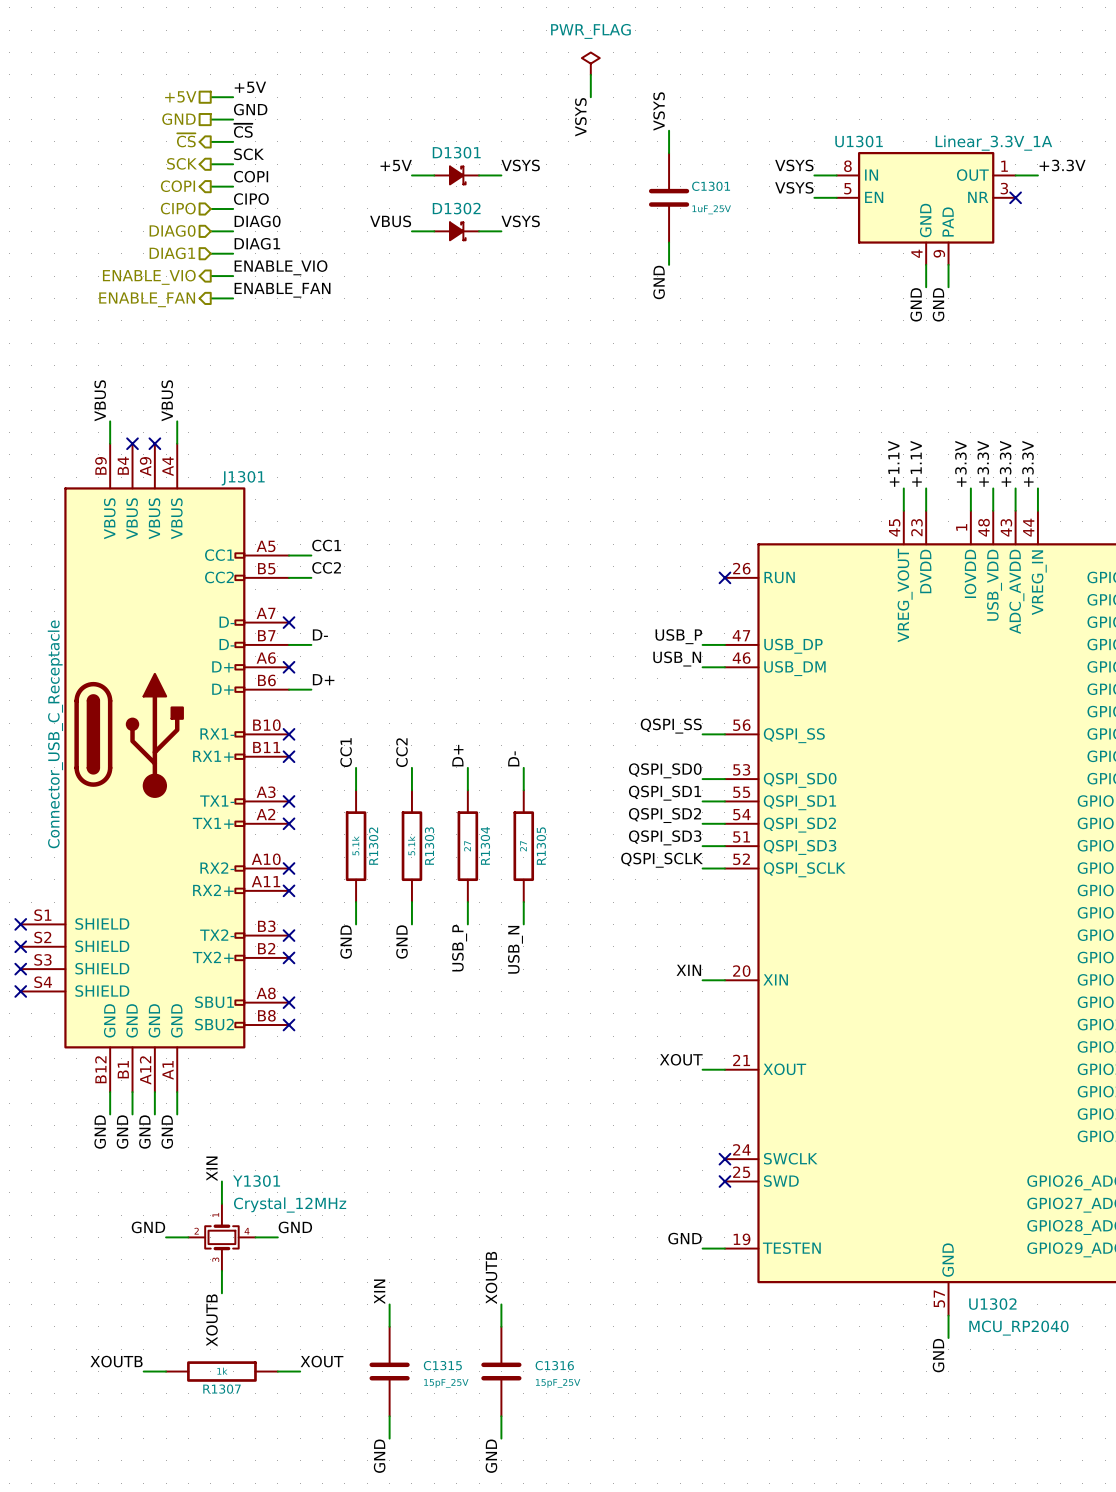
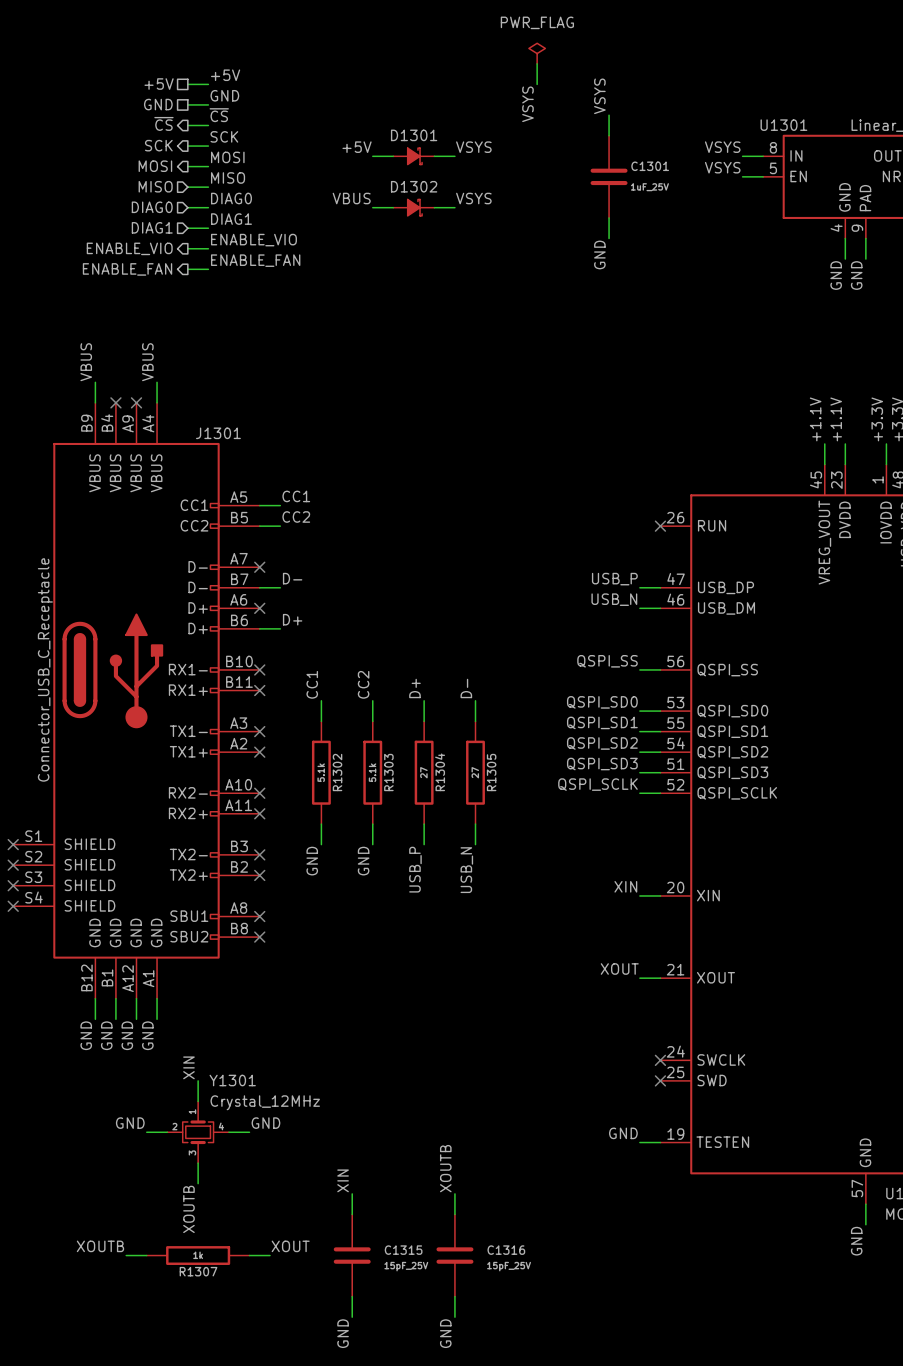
label: COPI (251, 176) -> MOSI (227, 157)
hierarchical label: COPI (177, 186) -> MOSI (155, 166)
label: CIPO (251, 199) -> MISO (228, 177)
hierarchical label: CIPO (178, 208) -> MISO (155, 186)

